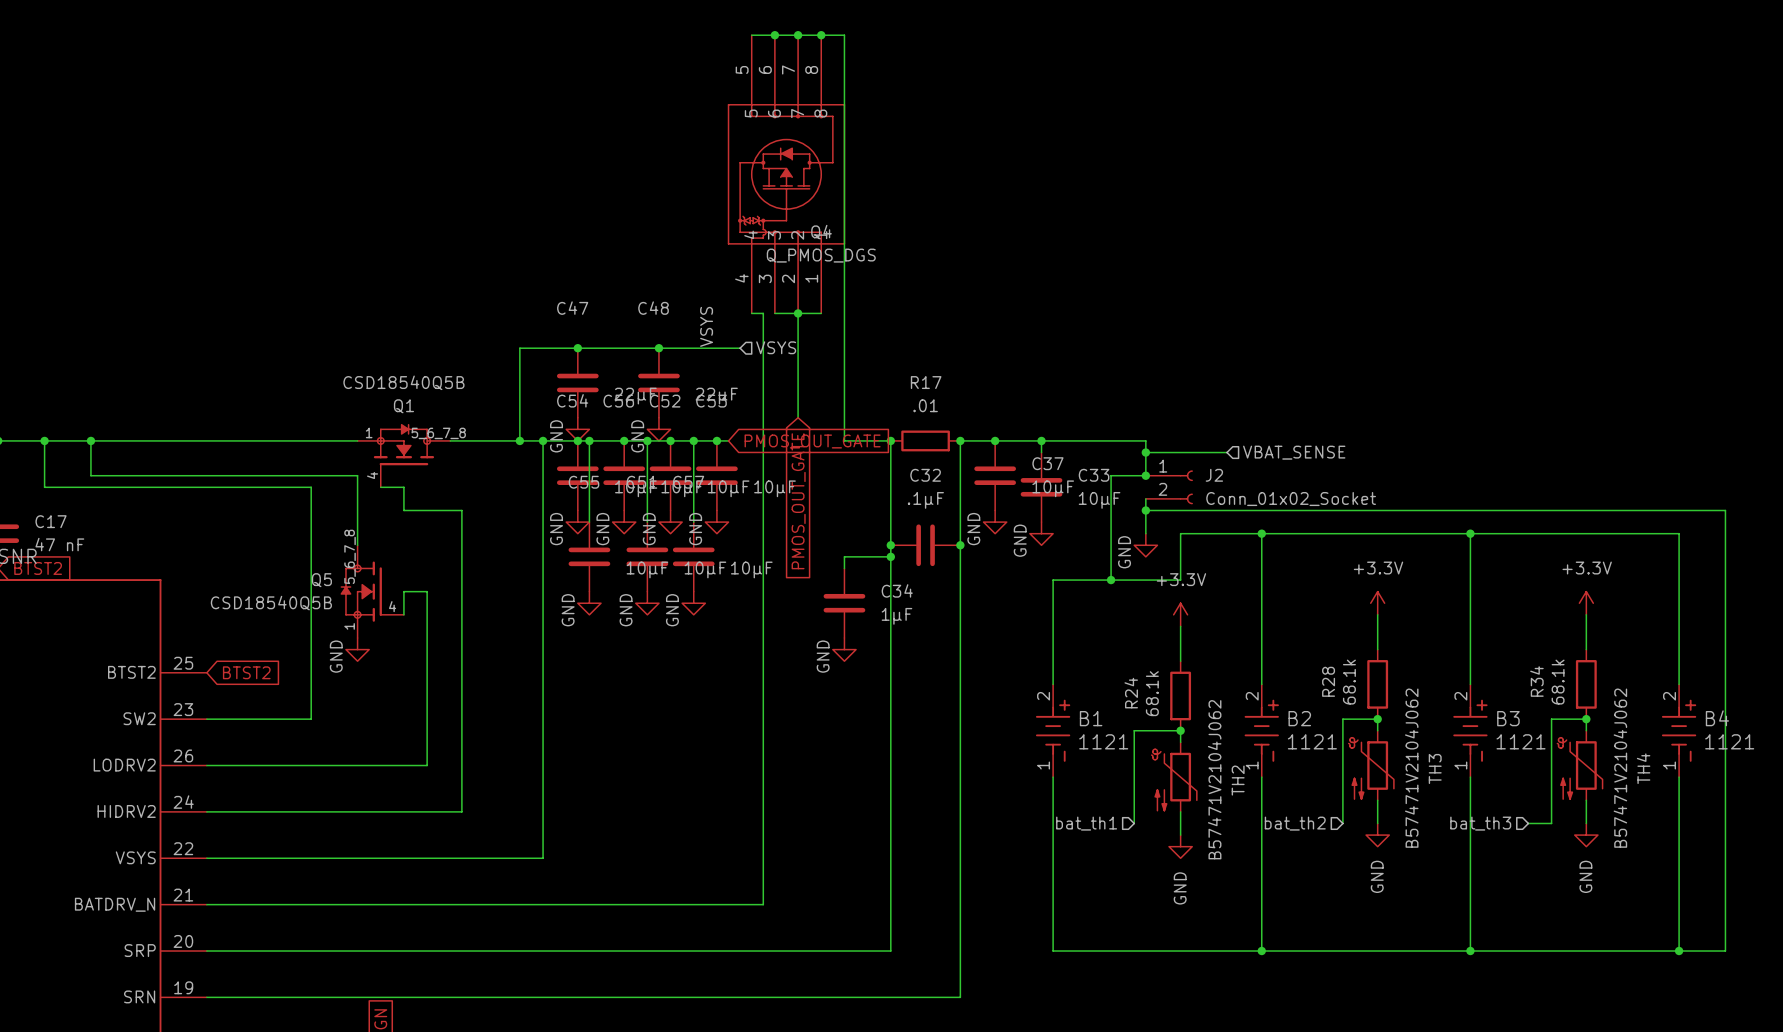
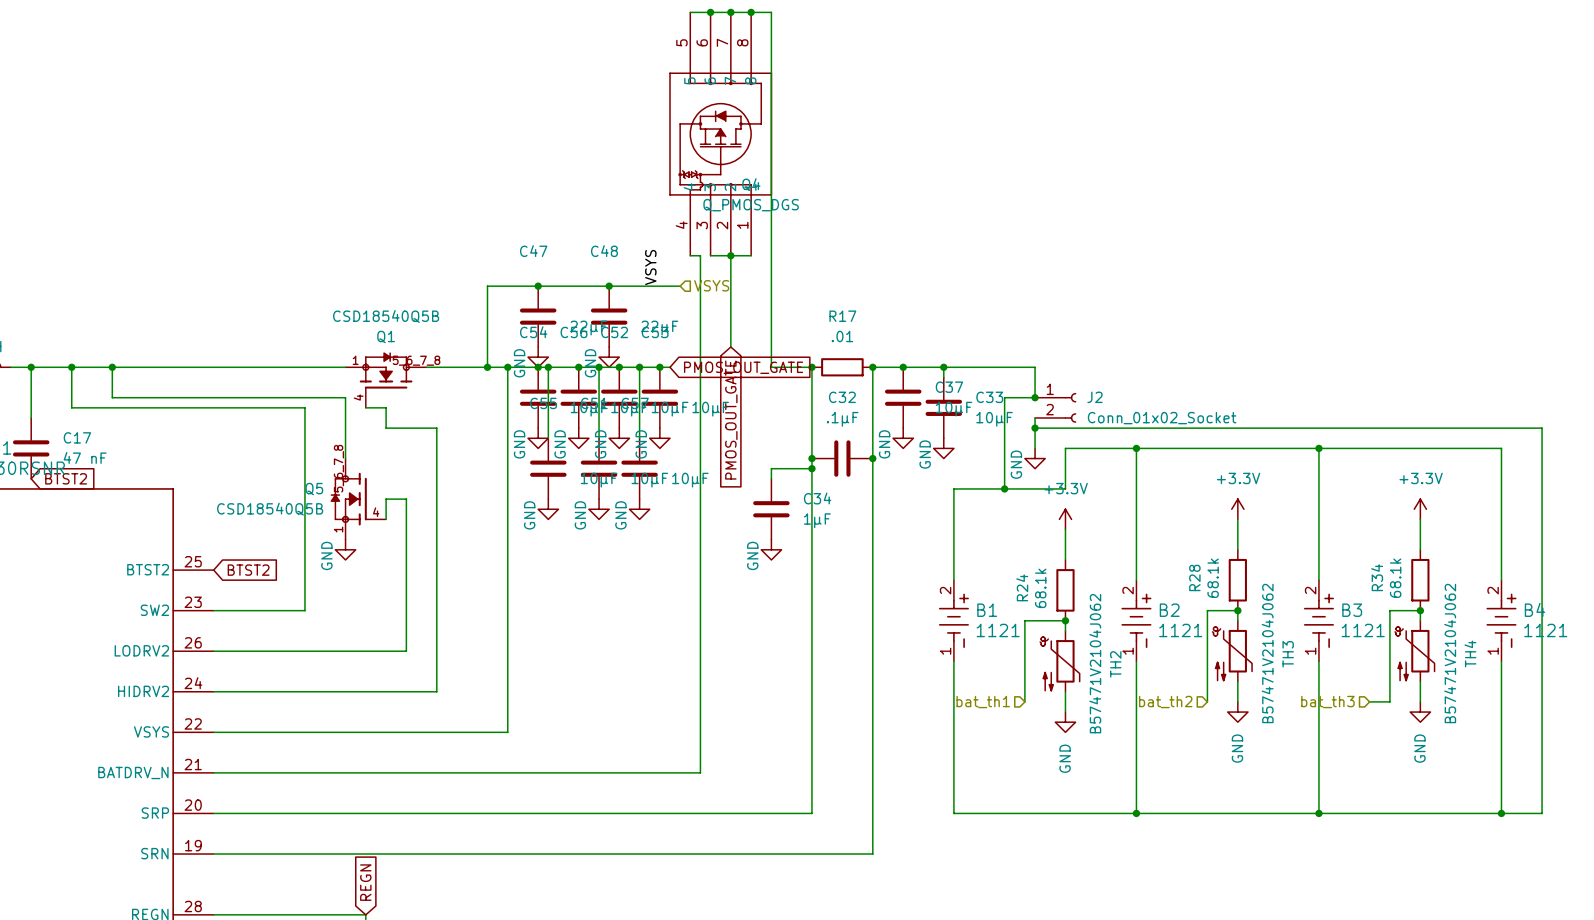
wire: (1145, 452) (1226, 452) -> none
junction: (1145, 452) -> none
hierarchical label: VBAT_SENSE (1294, 452) -> none

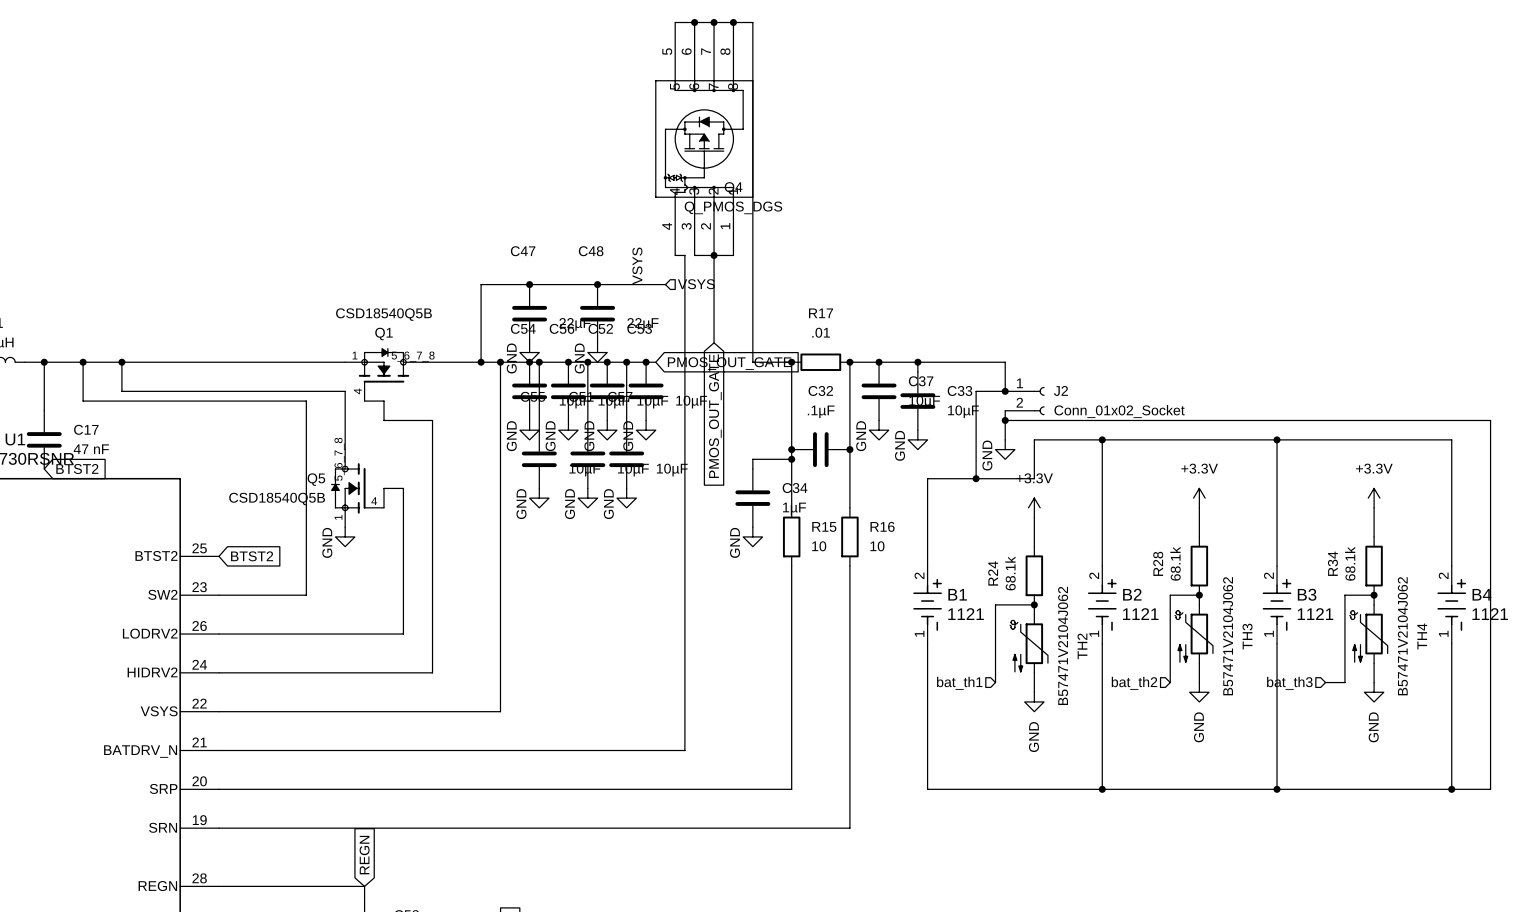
wire: (811, 519) (811, 580) -> none
wire: (872, 519) (872, 580) -> none
R15: none -> 10 (791, 536)
R16: none -> 10 (849, 536)

